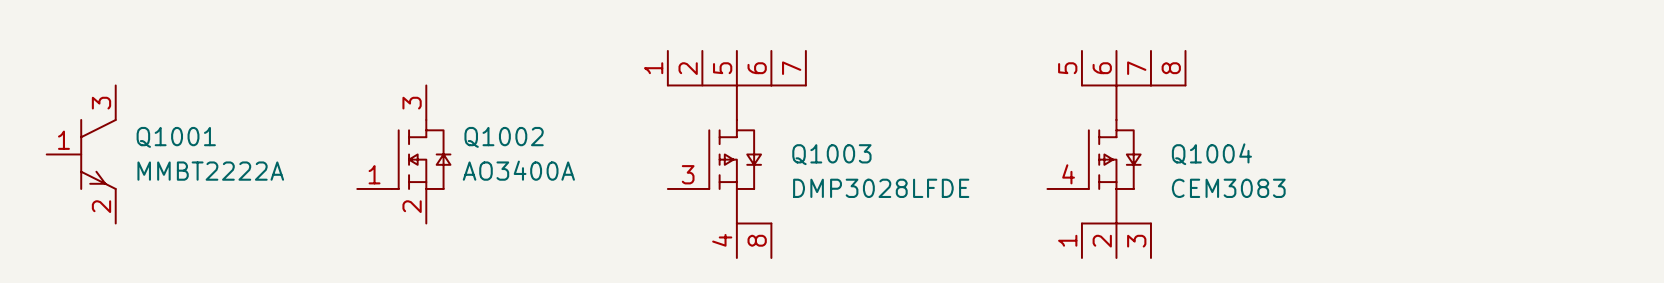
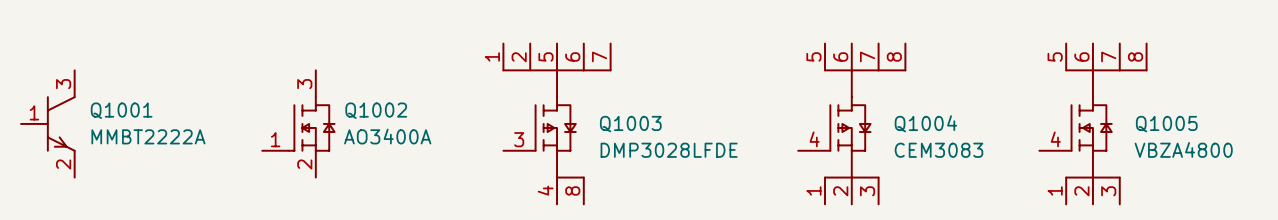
Q1005: none -> VBZA4800 (1092, 123)

